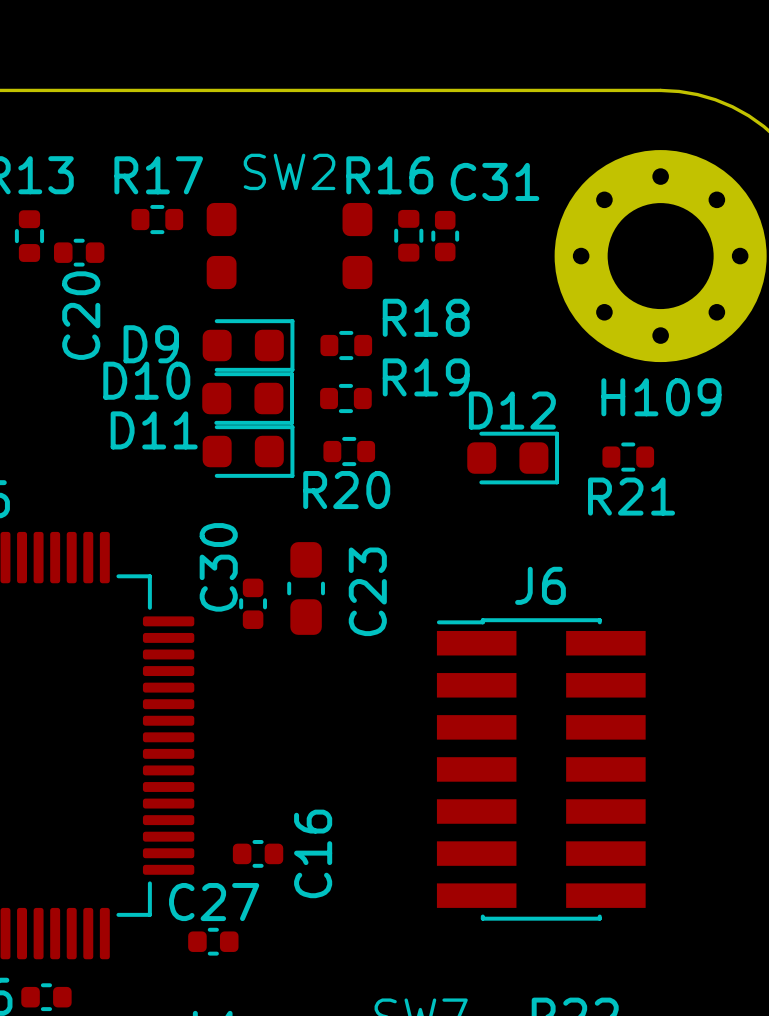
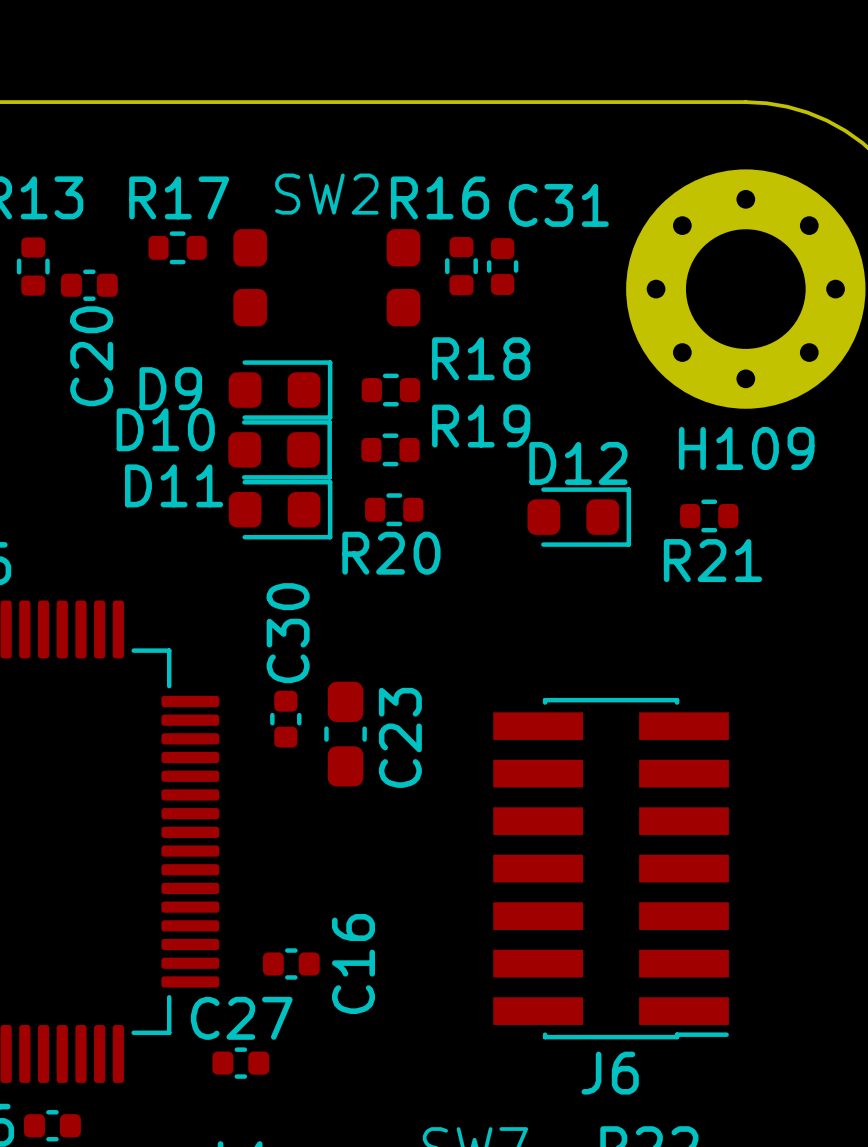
C30 name position: C30 (218, 567) -> C30 (288, 633)
C23 position: (306, 588) -> (345, 734)
C23 name position: C23 (367, 591) -> C23 (400, 737)
C30 position: (253, 603) -> (285, 719)
J6 rotation: 0° (541, 769) -> 180° (611, 868)

